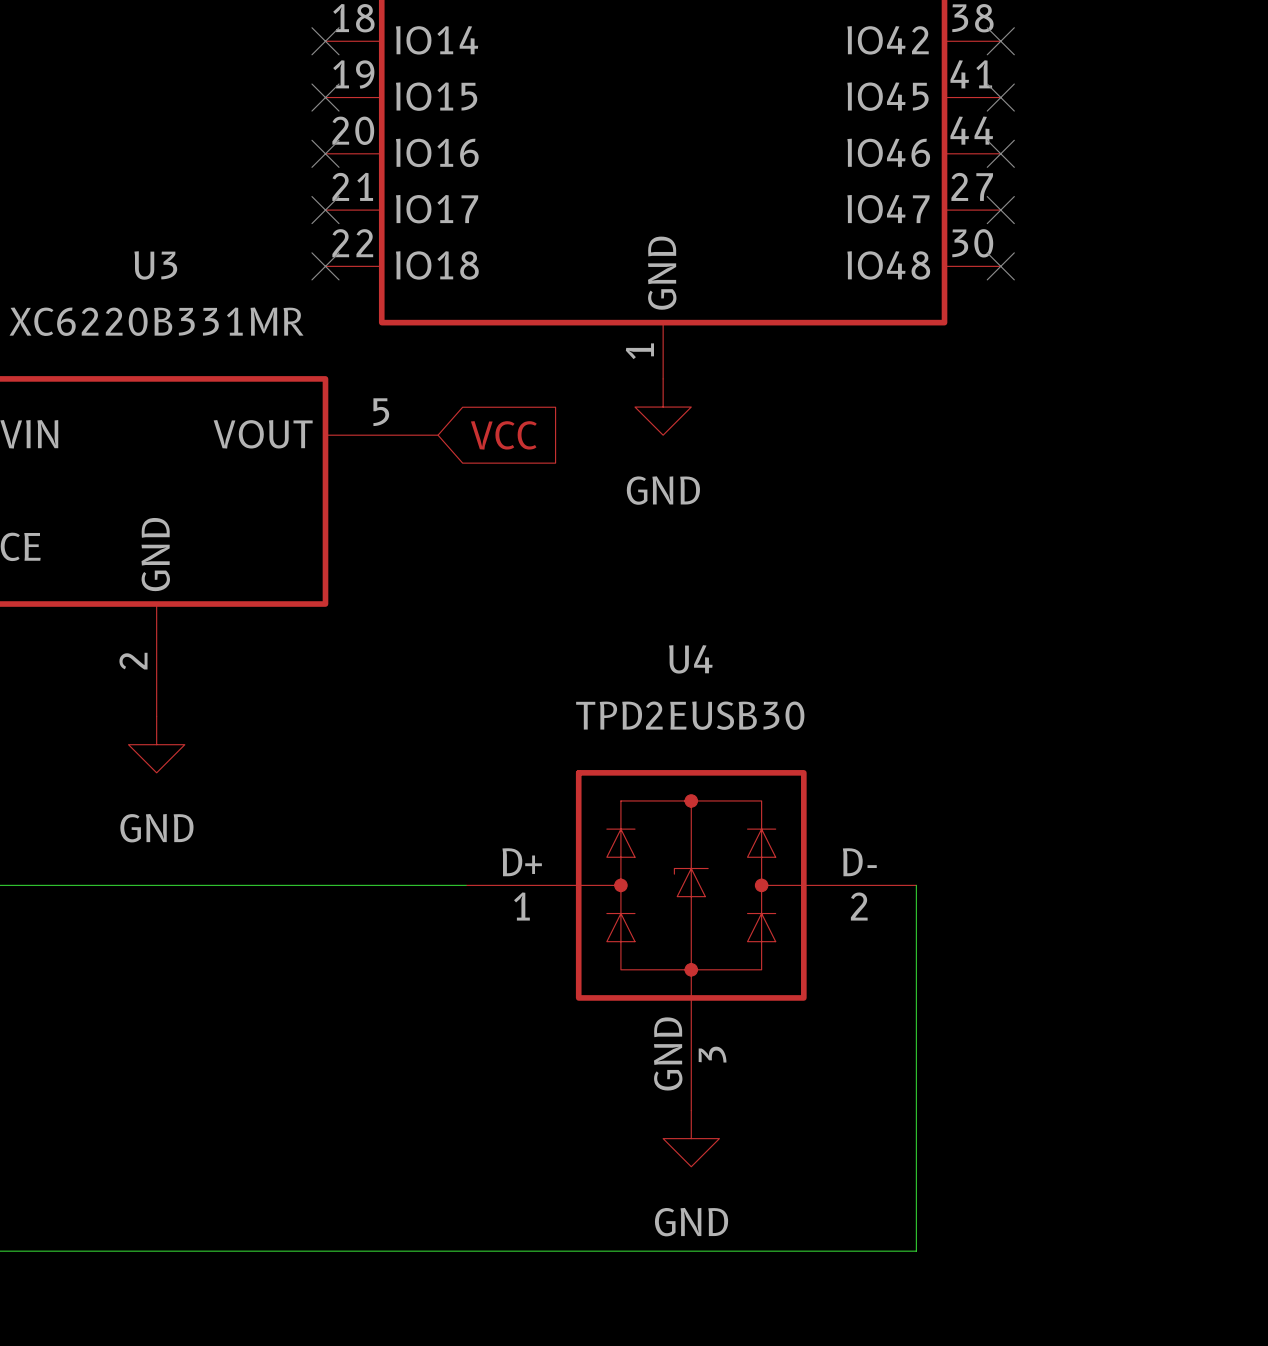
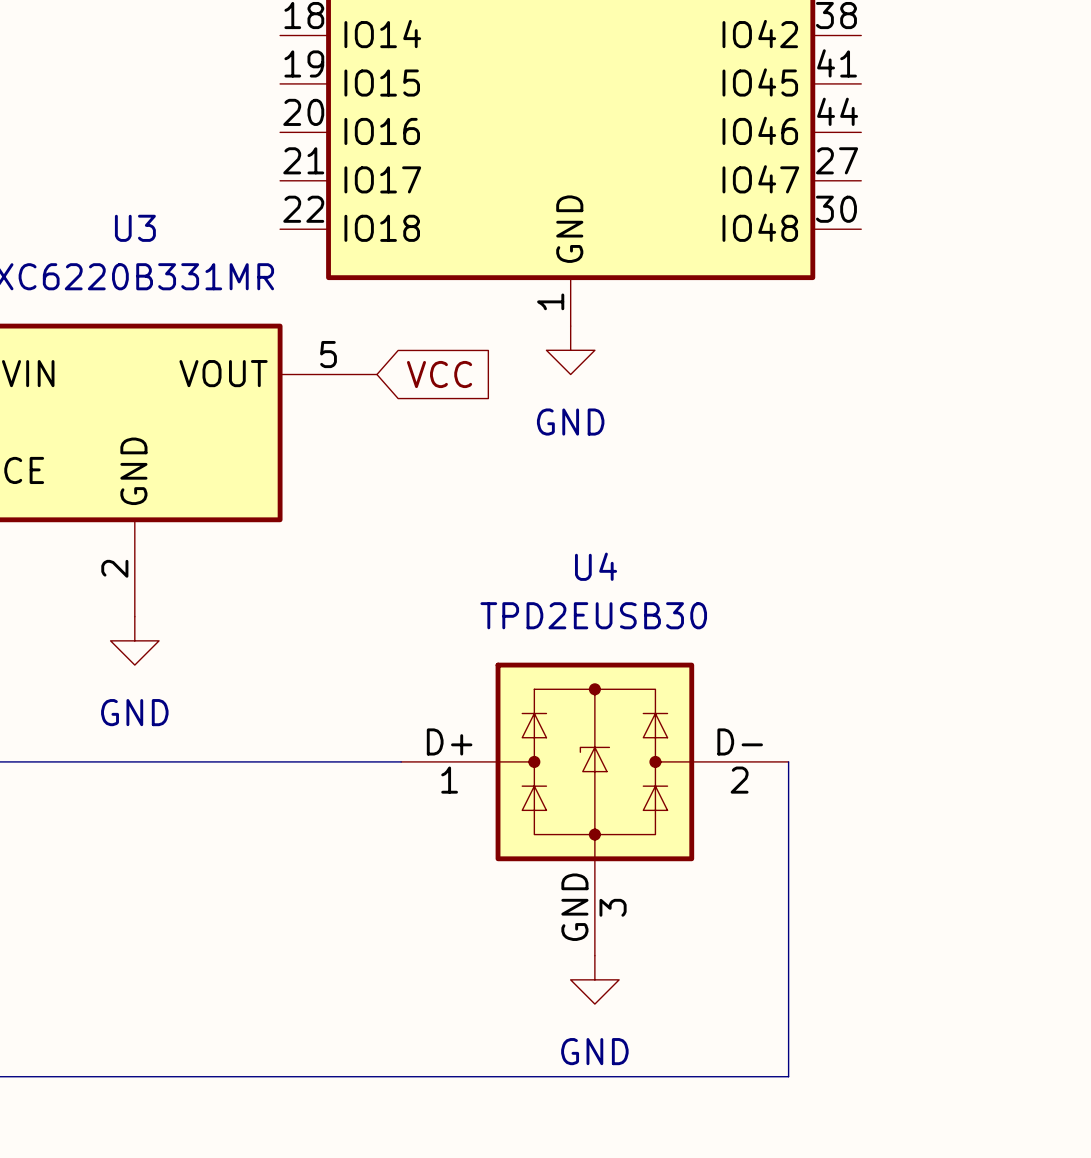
no-connect mark: (325, 41) -> none
no-connect mark: (1000, 41) -> none
no-connect mark: (325, 97) -> none
no-connect mark: (1000, 97) -> none
no-connect mark: (325, 153) -> none
no-connect mark: (1000, 153) -> none
no-connect mark: (325, 210) -> none
no-connect mark: (1000, 210) -> none
no-connect mark: (325, 266) -> none
no-connect mark: (1000, 266) -> none

